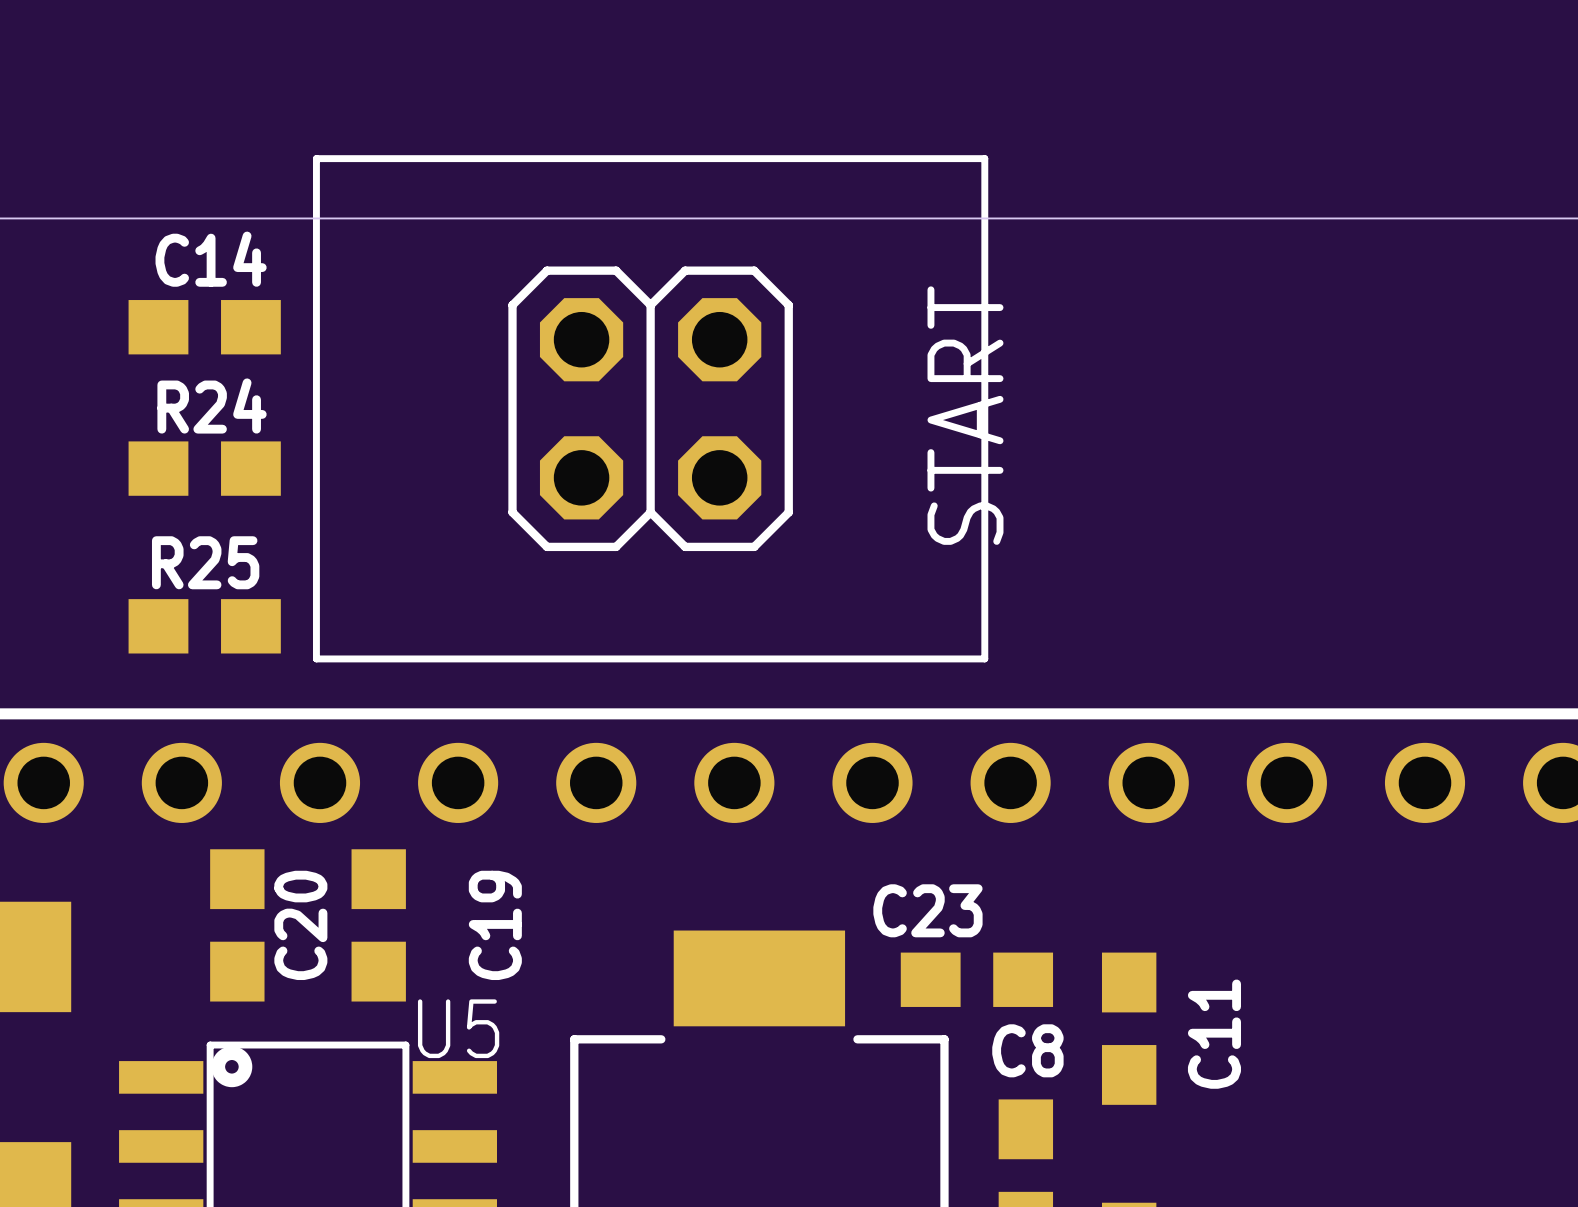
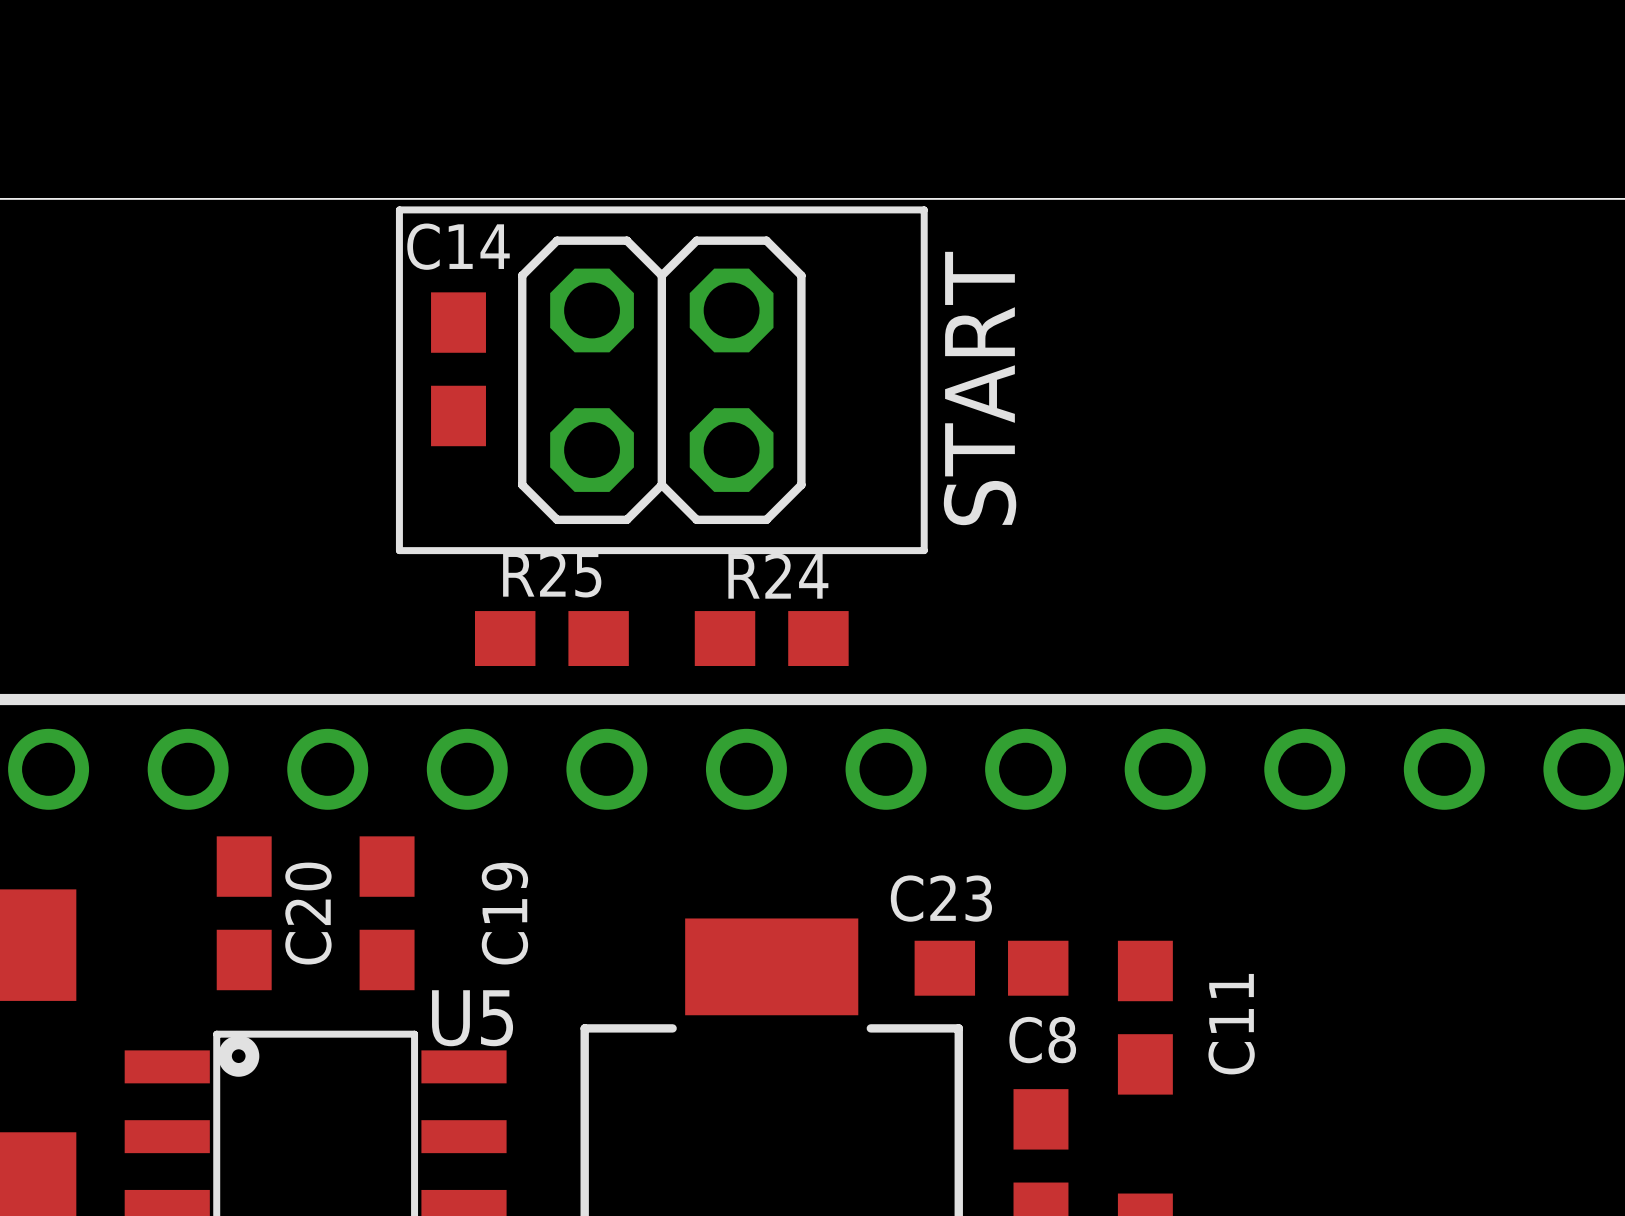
START footprint: [313, 155, 989, 663] -> [395, 206, 928, 555]
C14 rotation: 0° (204, 327) -> 90° clockwise (458, 369)
C14 position: (204, 327) -> (458, 369)
R24 position: (204, 468) -> (771, 638)
R25 position: (204, 626) -> (551, 638)

